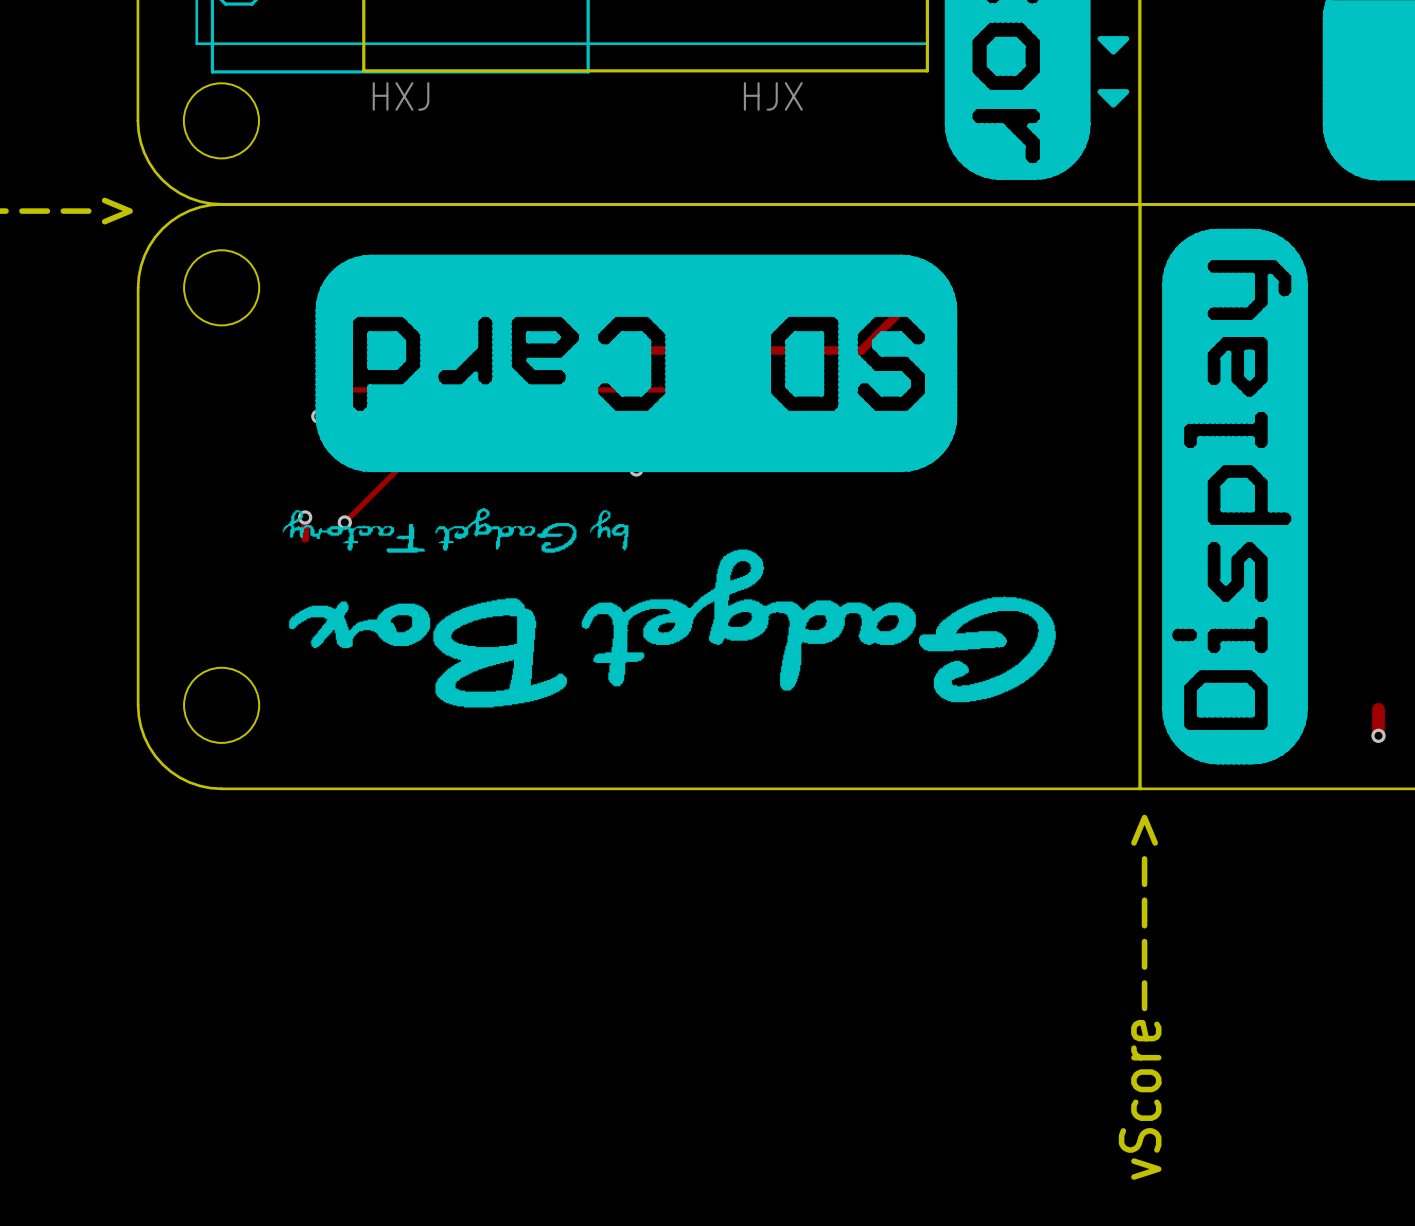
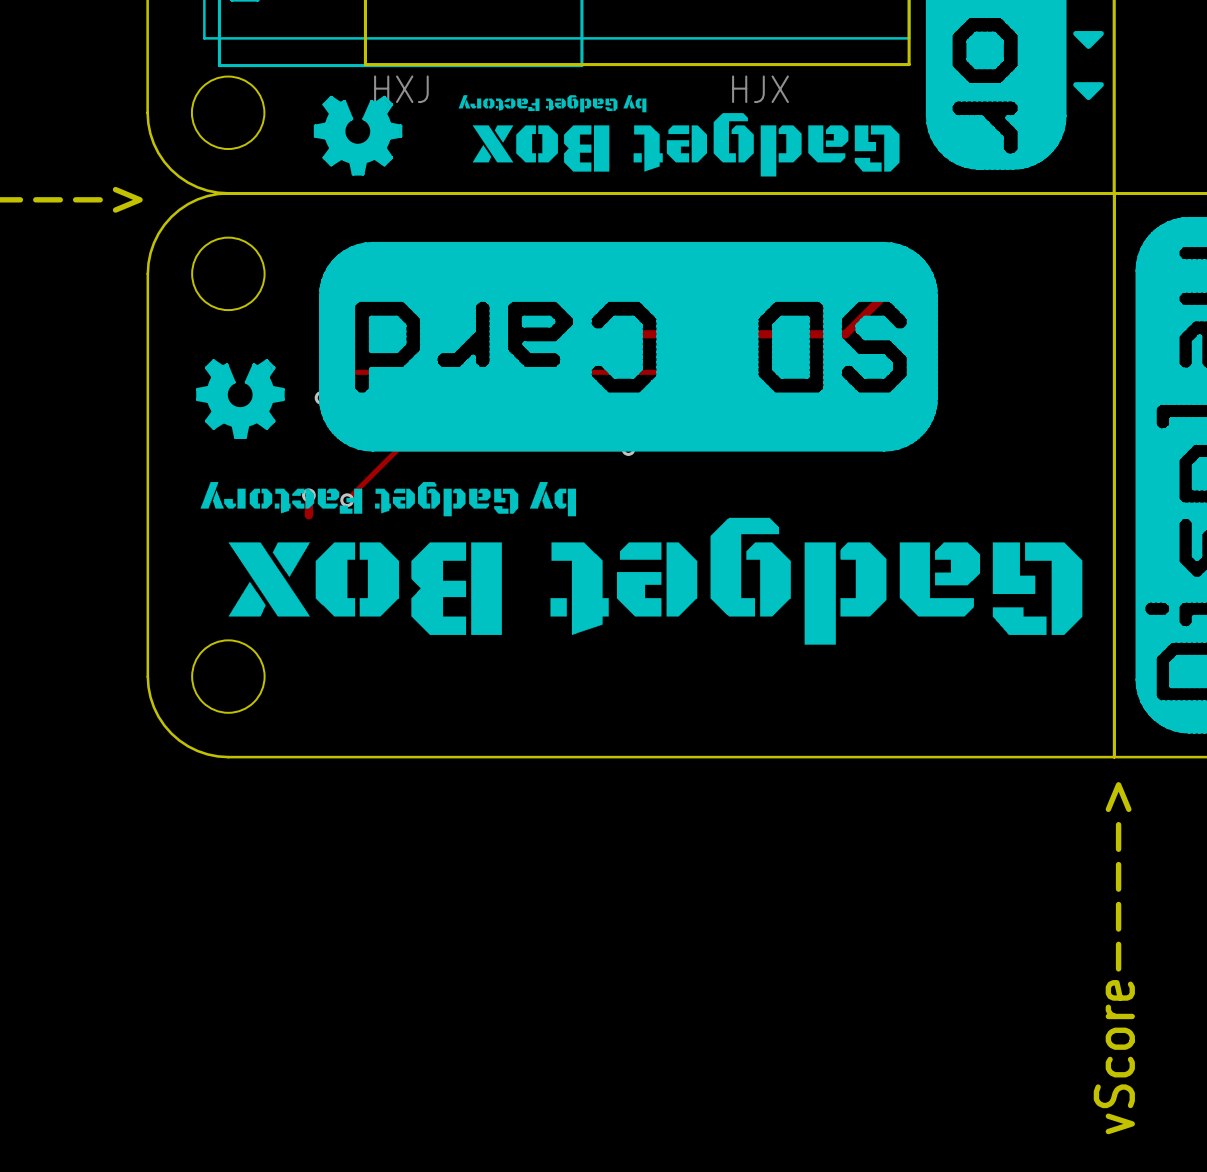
drawing: none -> [458, 95, 900, 177]
drawing: none -> [313, 95, 403, 176]
drawing: none -> [196, 359, 285, 440]
drawing: none -> [200, 482, 1083, 645]
drawing: [282, 508, 1056, 708] -> none

